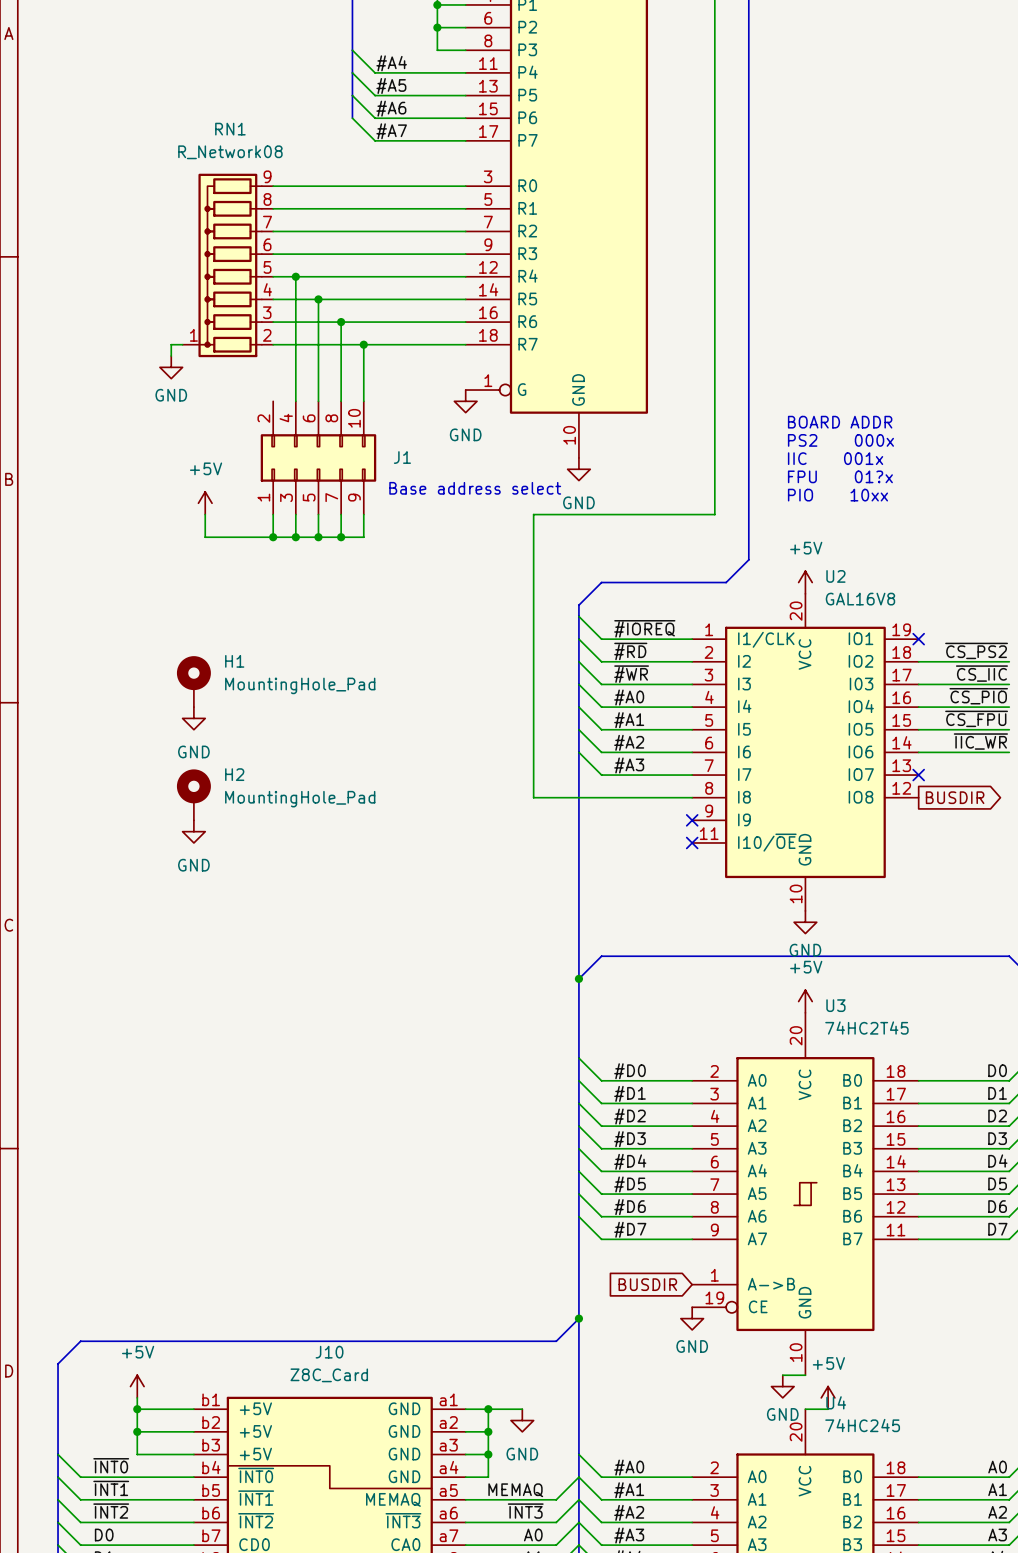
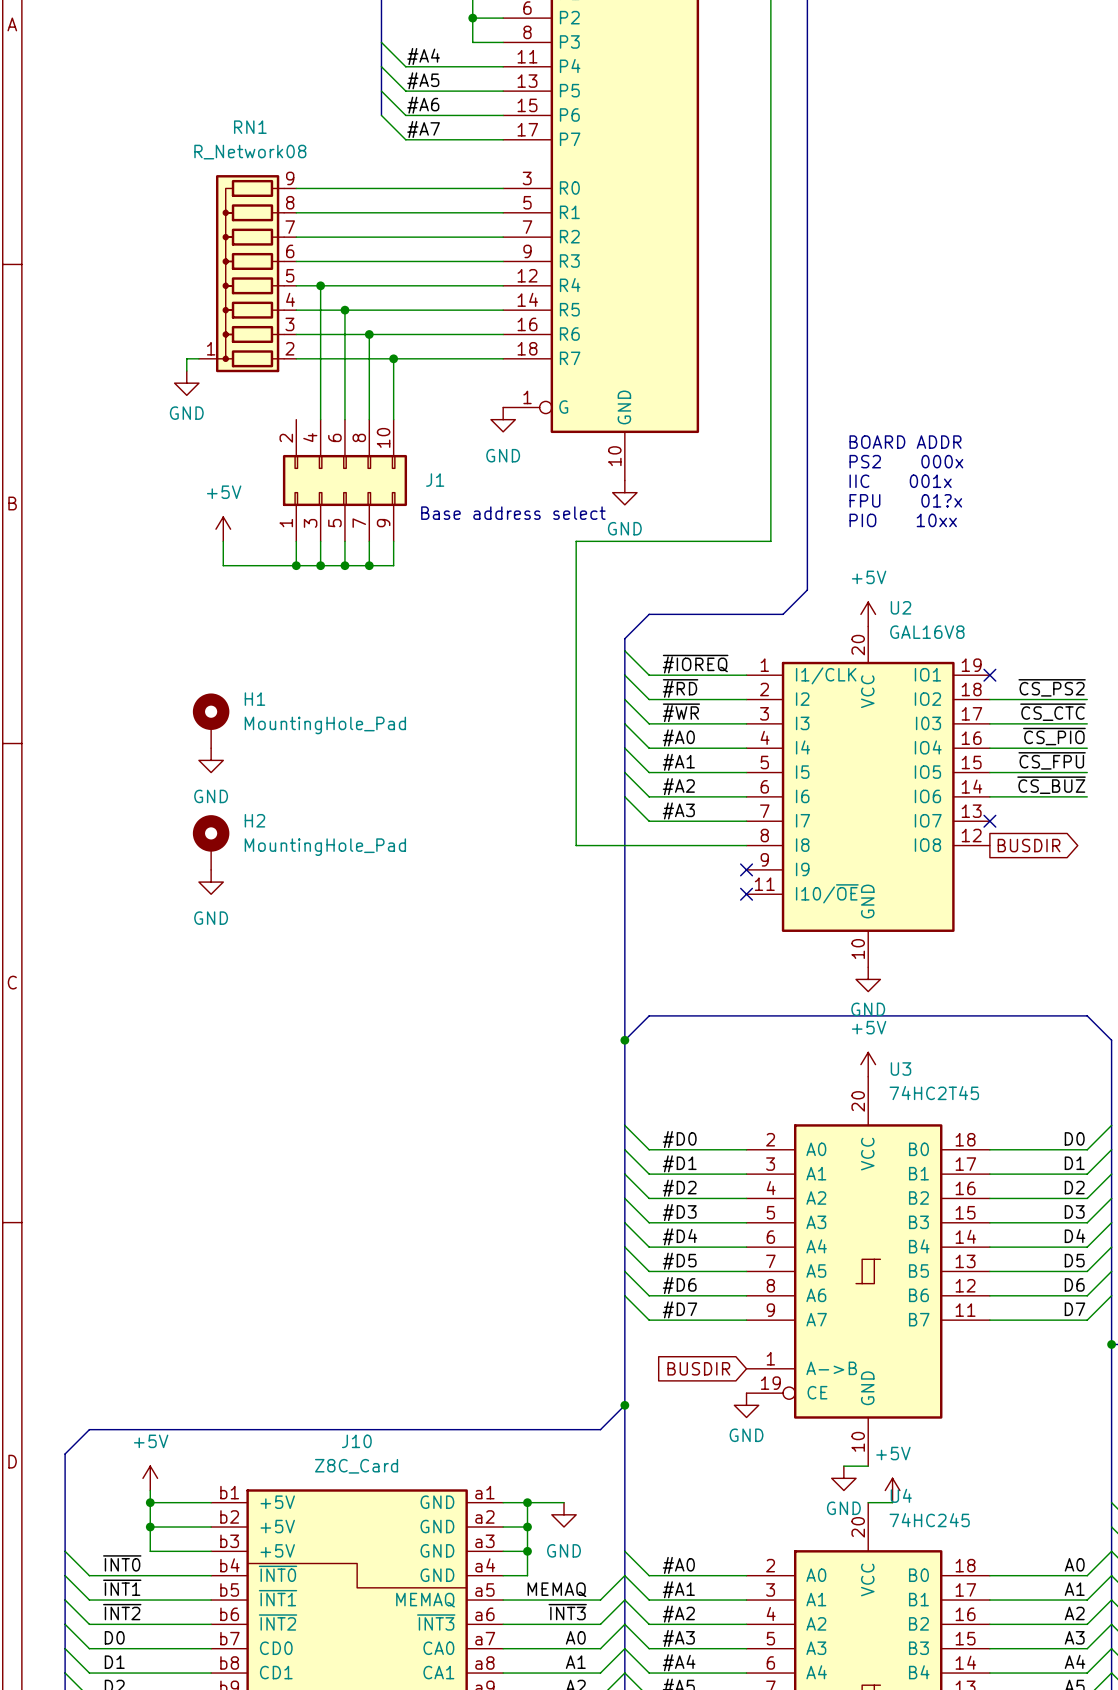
label: ~{CS_IIC} (981, 673) -> ~{CS_CTC} (1052, 712)
label: ~{IIC_WR} (980, 741) -> ~{CS_BUZ} (1051, 785)

